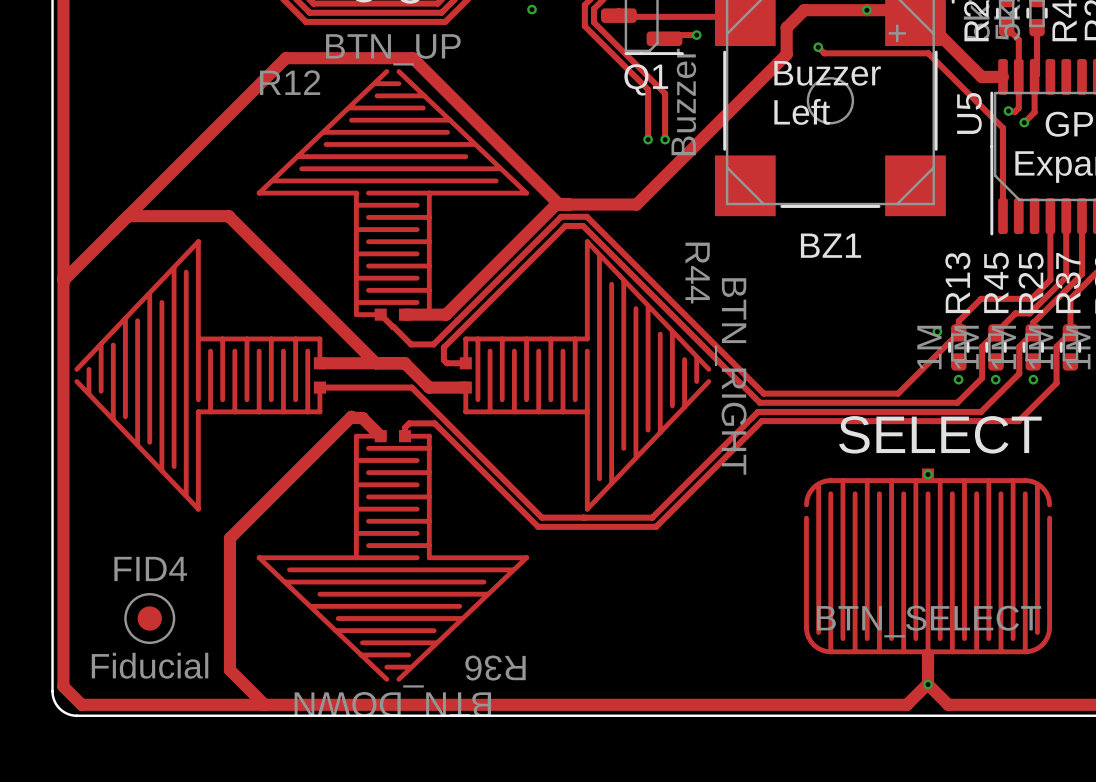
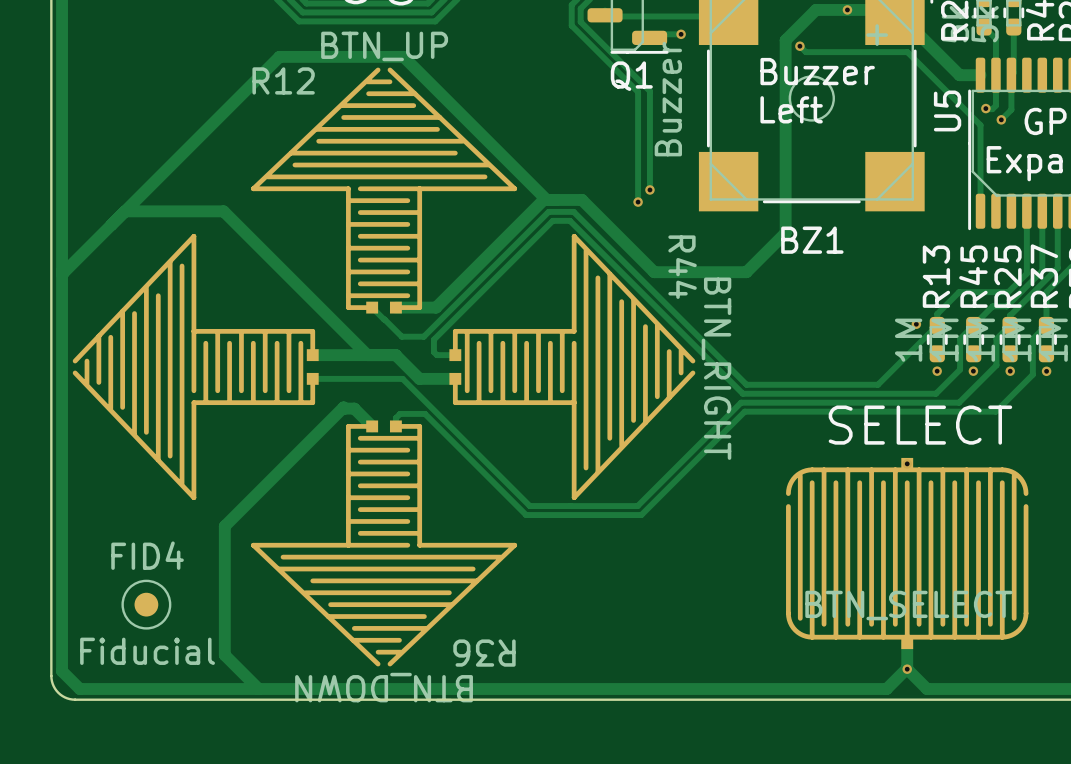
via: (532, 9) -> none
track: (834, 10) (804, 10) (786, 27) (786, 54) (636, 204) (595, 204) -> (815, 9) (785, 40) (785, 232) (746, 272) (654, 272) (582, 199)
track: (648, 89) (648, 139) -> (633, 87) (638, 92) (638, 202)
track: (665, 93) (665, 139) -> (649, 91) (649, 189)
via: (648, 139) -> none
via: (665, 139) -> none
via: none -> (649, 189)
via: none -> (638, 202)
via: none -> (1046, 371)

